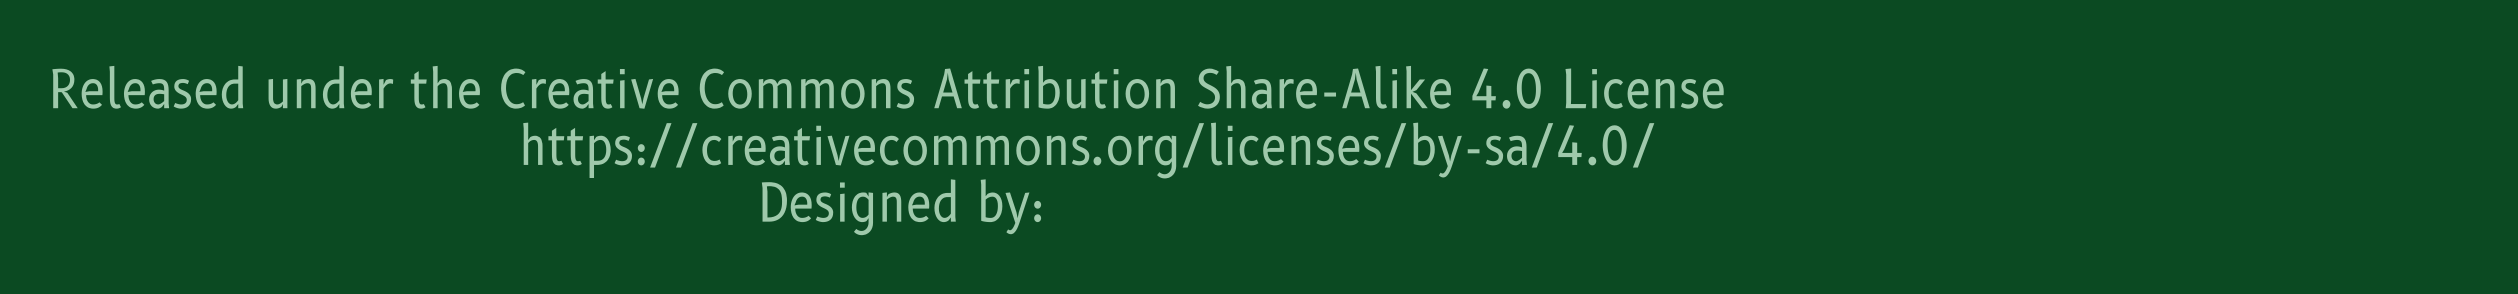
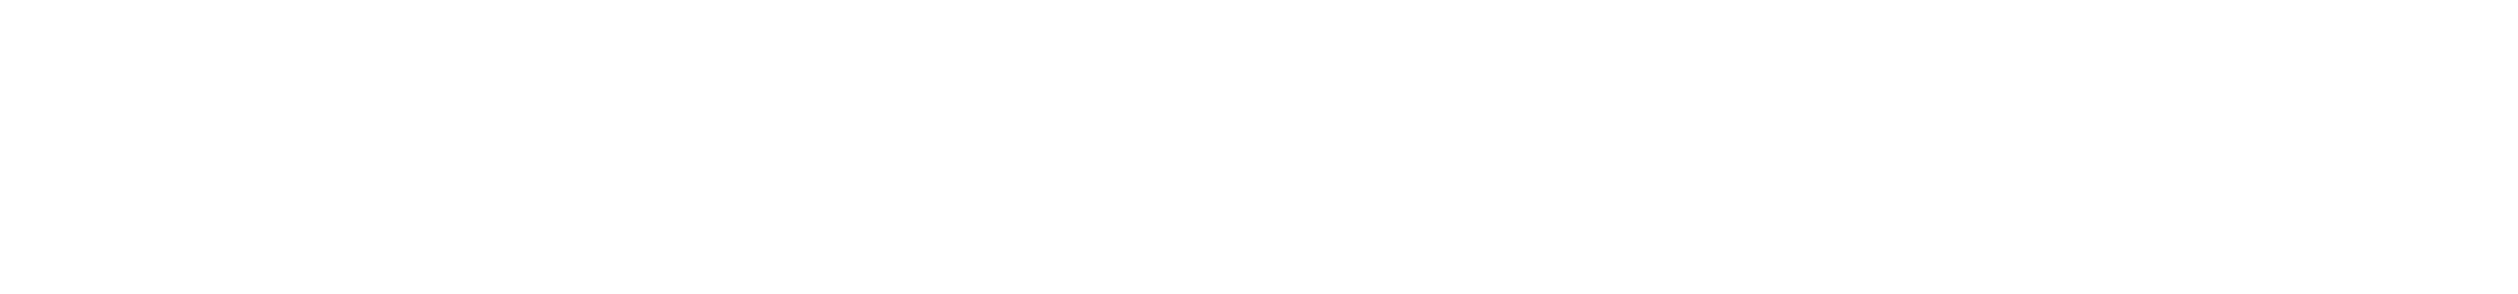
drawing: [52, 65, 1724, 236] -> none

